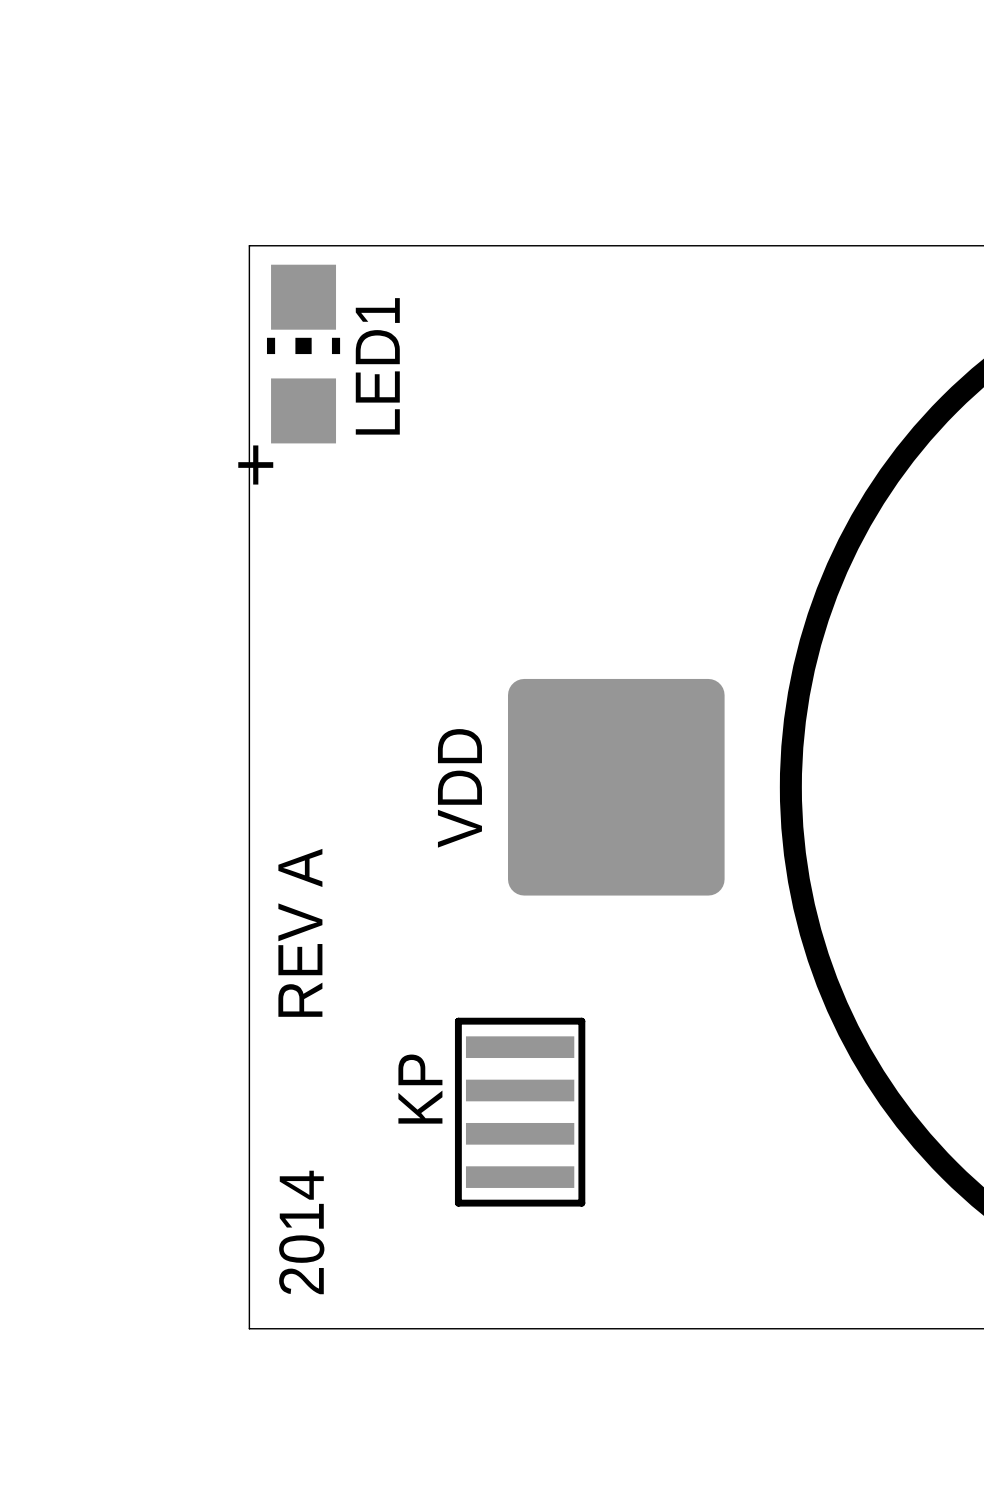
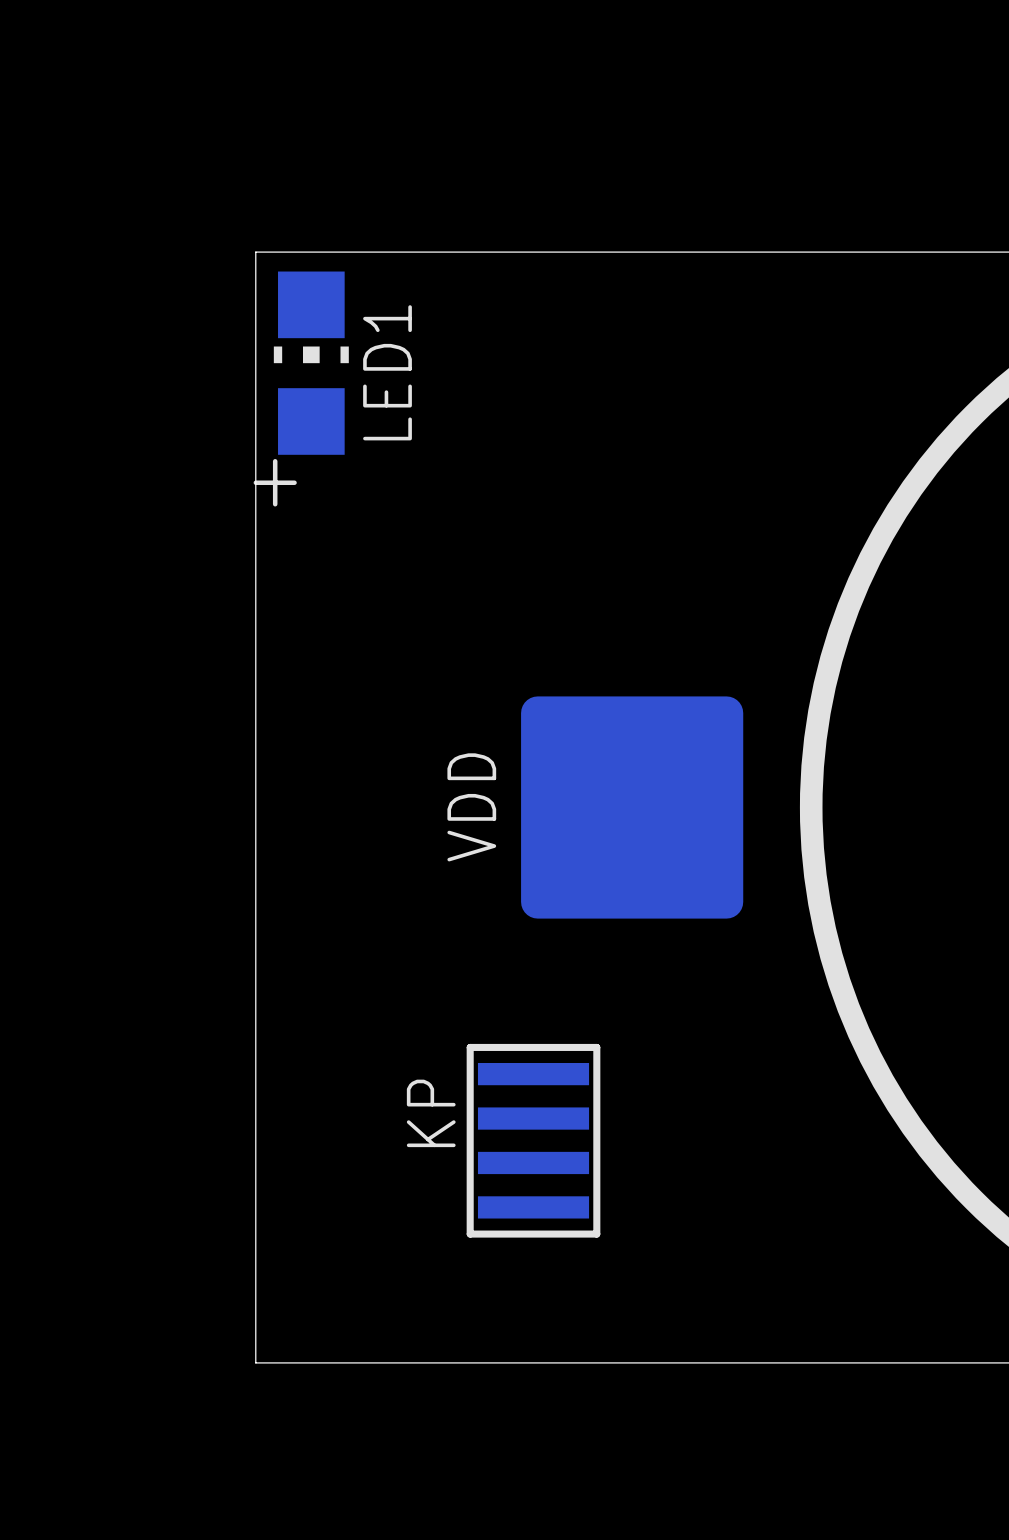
text: REV A (300, 932) -> none
text: 2014 (301, 1232) -> none

